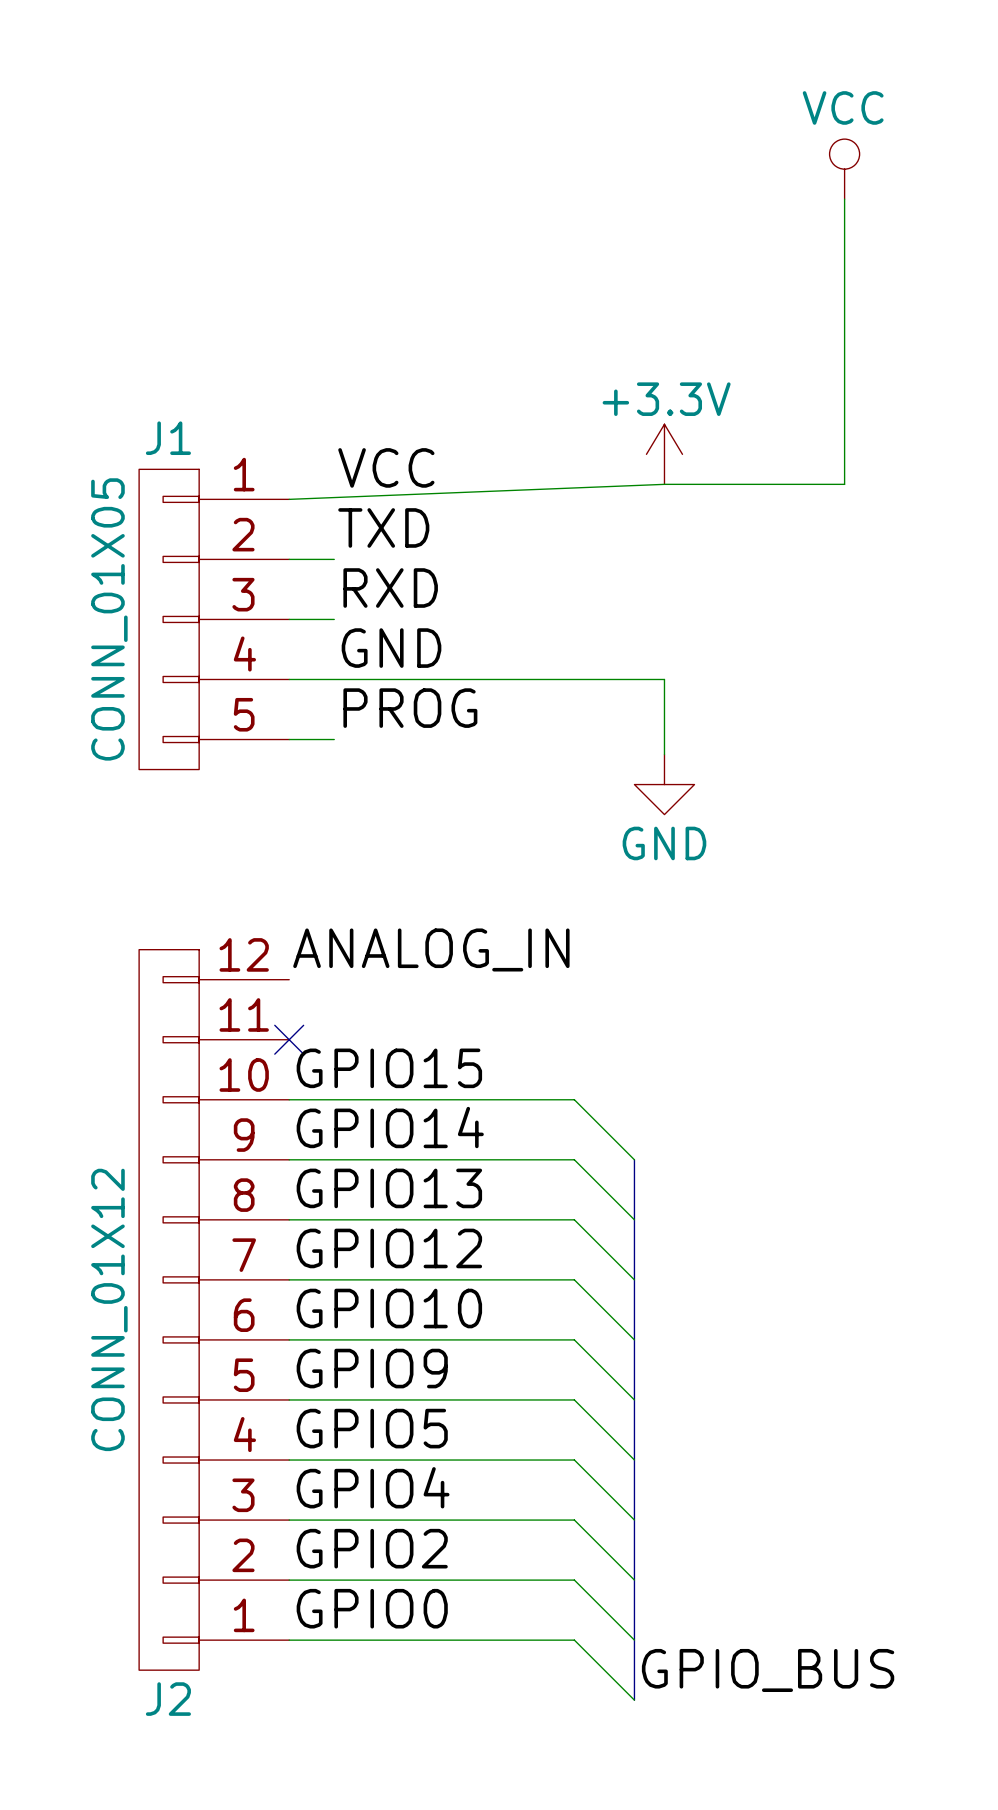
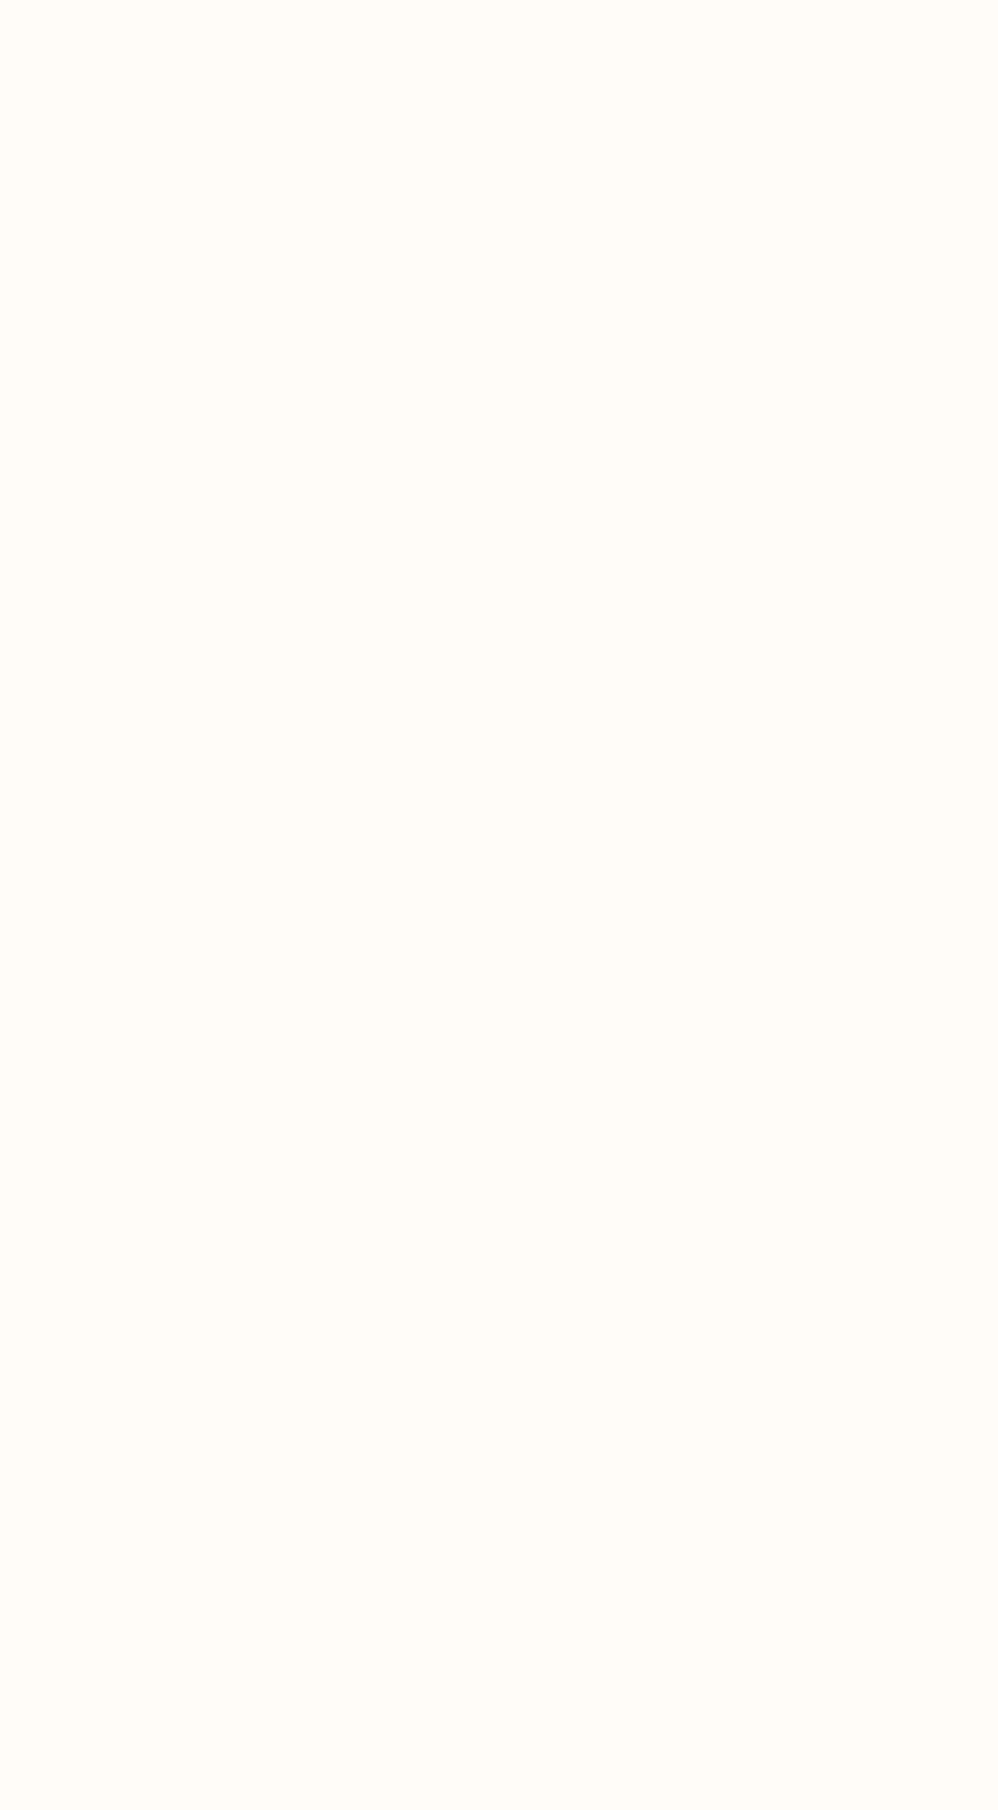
power symbol: VCC (844, 169) -> none
wire: (844, 199) (844, 484) (664, 484) (289, 499) -> none
power symbol: +3.3V (664, 454) -> none
label: VCC (386, 467) -> none
label: TXD (383, 527) -> none
wire: (289, 559) (334, 559) -> none
label: RXD (390, 588) -> none
J1: CONN_01X05 (214, 619) -> none
wire: (289, 619) (334, 619) -> none
label: GND (391, 648) -> none
wire: (289, 679) (664, 679) (664, 754) -> none
label: PROG (410, 708) -> none
wire: (289, 739) (334, 739) -> none
power symbol: GND (664, 784) -> none
label: ANALOG_IN (431, 949) -> none
no-connect mark: (289, 1039) -> none
label: GPIO15 (389, 1068) -> none
wire: (289, 1099) (574, 1099) (634, 1159) -> none
label: GPIO14 (390, 1127) -> none
wire: (289, 1159) (574, 1159) (634, 1219) -> none
bus: (634, 1159) (634, 1700) -> none
label: GPIO13 (389, 1188) -> none
wire: (289, 1219) (574, 1219) (634, 1279) -> none
label: GPIO12 (389, 1248) -> none
wire: (289, 1279) (574, 1279) (634, 1339) -> none
label: GPIO10 (389, 1308) -> none
J2: CONN_01X12 (214, 1309) -> none
wire: (289, 1339) (574, 1339) (634, 1399) -> none
label: GPIO9 (372, 1368) -> none
wire: (289, 1399) (574, 1399) (634, 1460) -> none
label: GPIO5 (372, 1428) -> none
wire: (289, 1460) (574, 1460) (634, 1520) -> none
label: GPIO4 (373, 1487) -> none
wire: (289, 1520) (574, 1520) (634, 1580) -> none
label: GPIO2 (372, 1548) -> none
wire: (289, 1580) (574, 1580) (634, 1640) -> none
label: GPIO0 (372, 1608) -> none
wire: (289, 1640) (574, 1640) (634, 1700) -> none
label: GPIO_BUS (768, 1670) -> none

